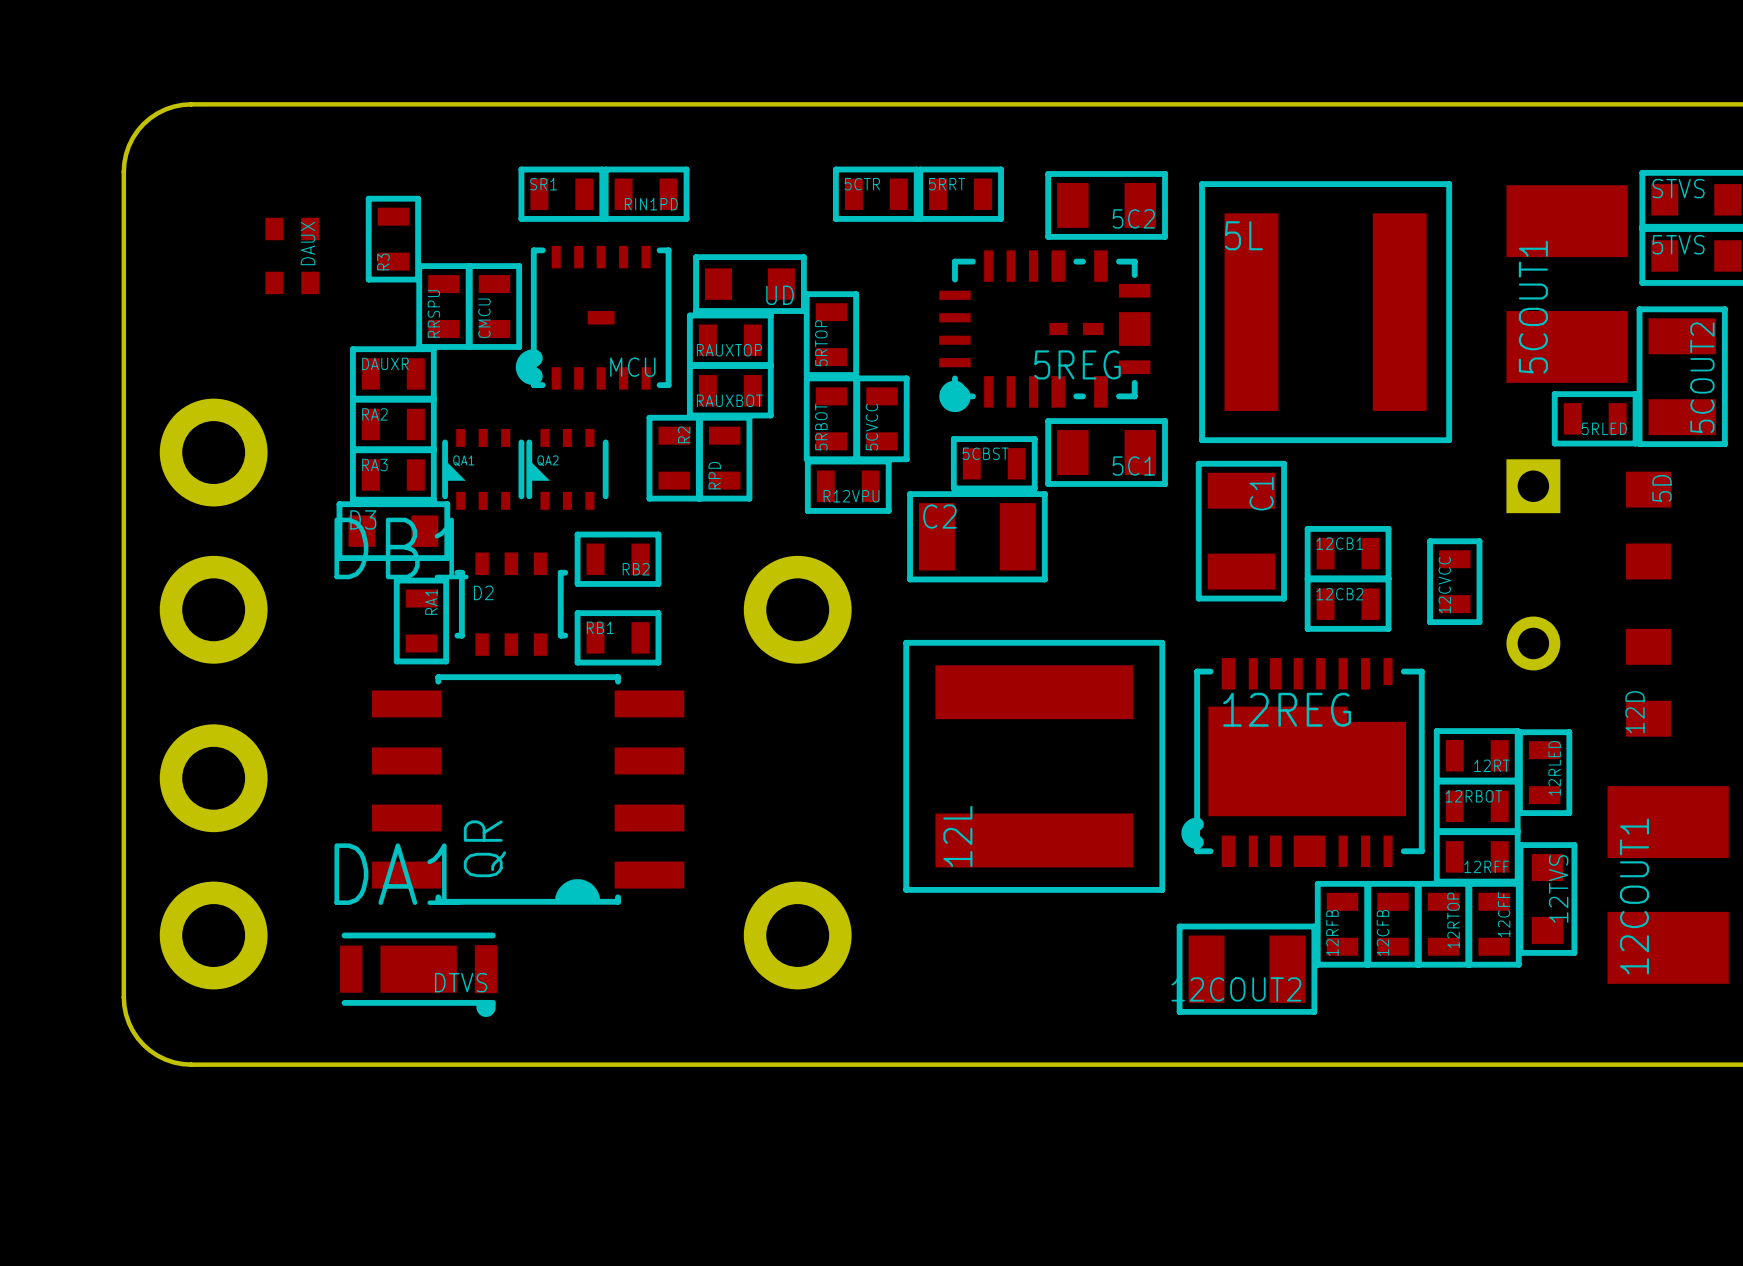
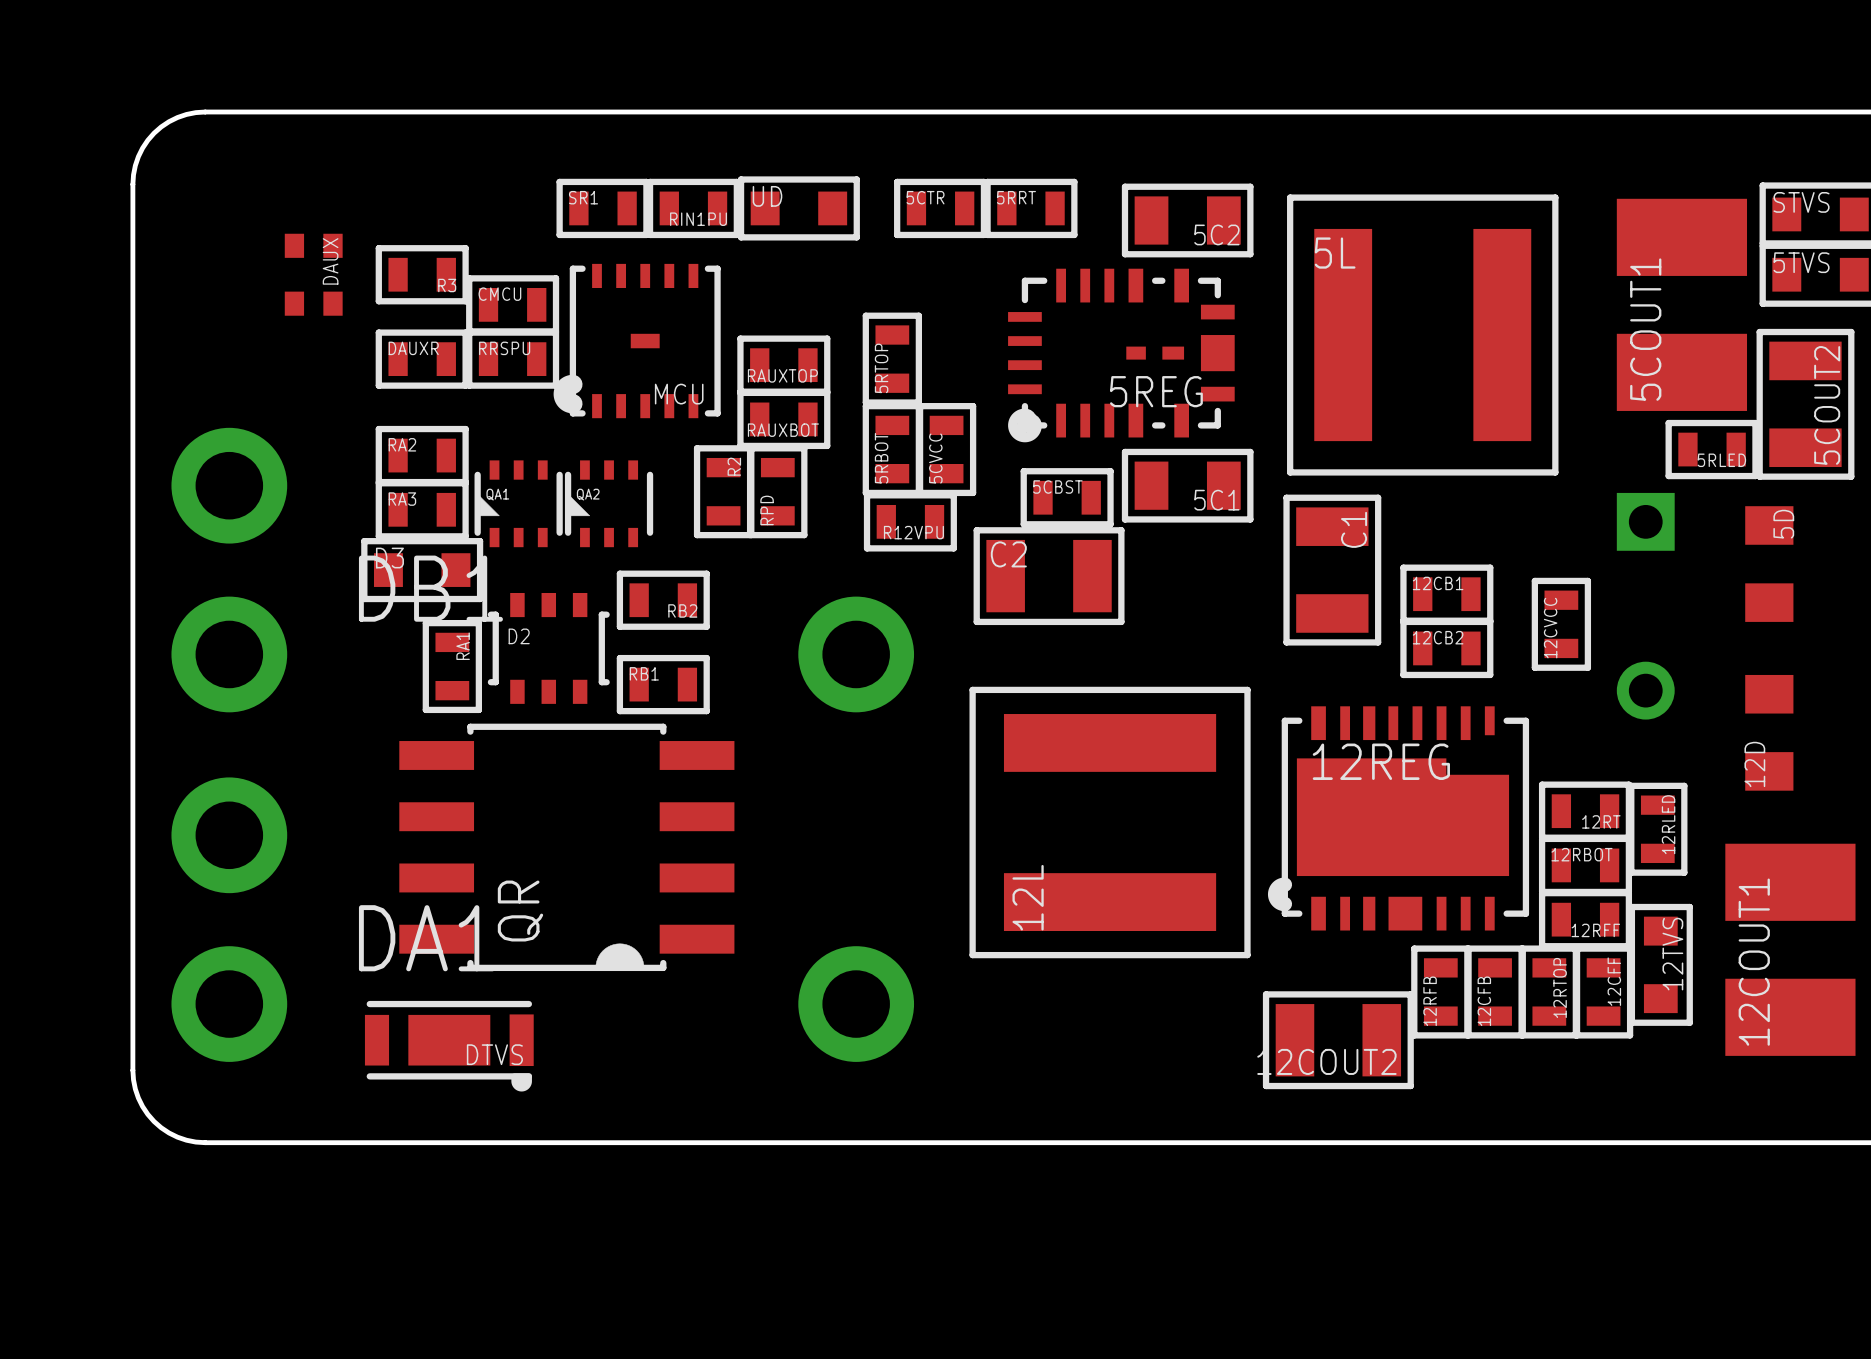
RIN1PD name: RIN1PD (651, 204) -> RIN1PU (698, 219)
R3 rotation: 0° (393, 239) -> 90° clockwise (422, 274)
UD position: (749, 284) -> (798, 208)
UD name position: UD (780, 295) -> UD (767, 196)
RRSPU rotation: 0° (443, 306) -> 90° clockwise (512, 359)
CMCU rotation: 0° (494, 306) -> 90° clockwise (512, 304)
DAUXR position: (393, 373) -> (422, 359)

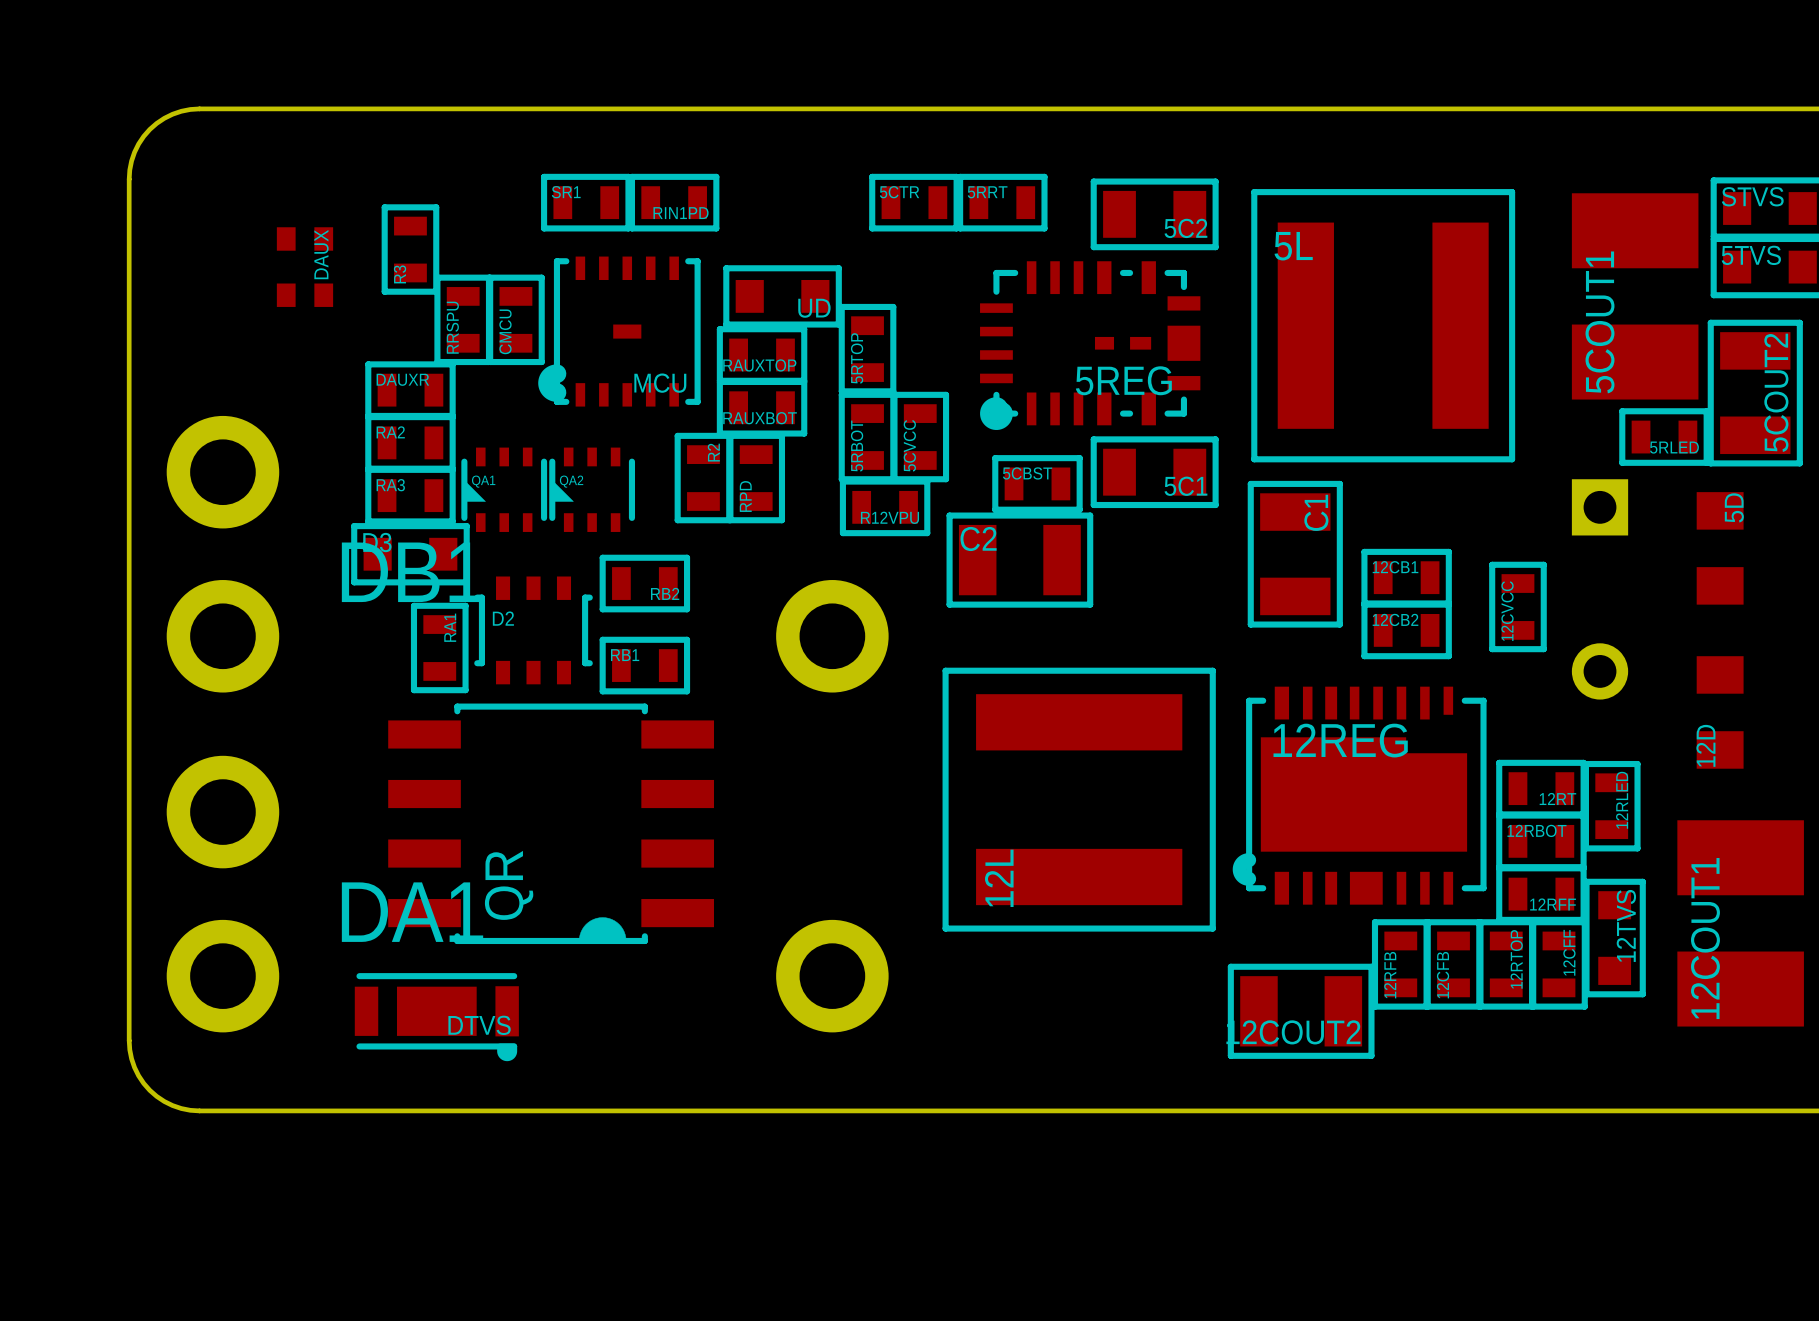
UD name position: UD (767, 196) -> UD (814, 308)
UD position: (798, 208) -> (782, 296)
RIN1PU name: RIN1PU (698, 219) -> RIN1PD (681, 213)
R3 rotation: 0° (422, 274) -> 90° clockwise (410, 249)
CMCU rotation: 0° (512, 304) -> 90° clockwise (515, 319)
DAUXR position: (422, 359) -> (410, 390)
RRSPU rotation: 0° (512, 359) -> 90° clockwise (463, 319)

